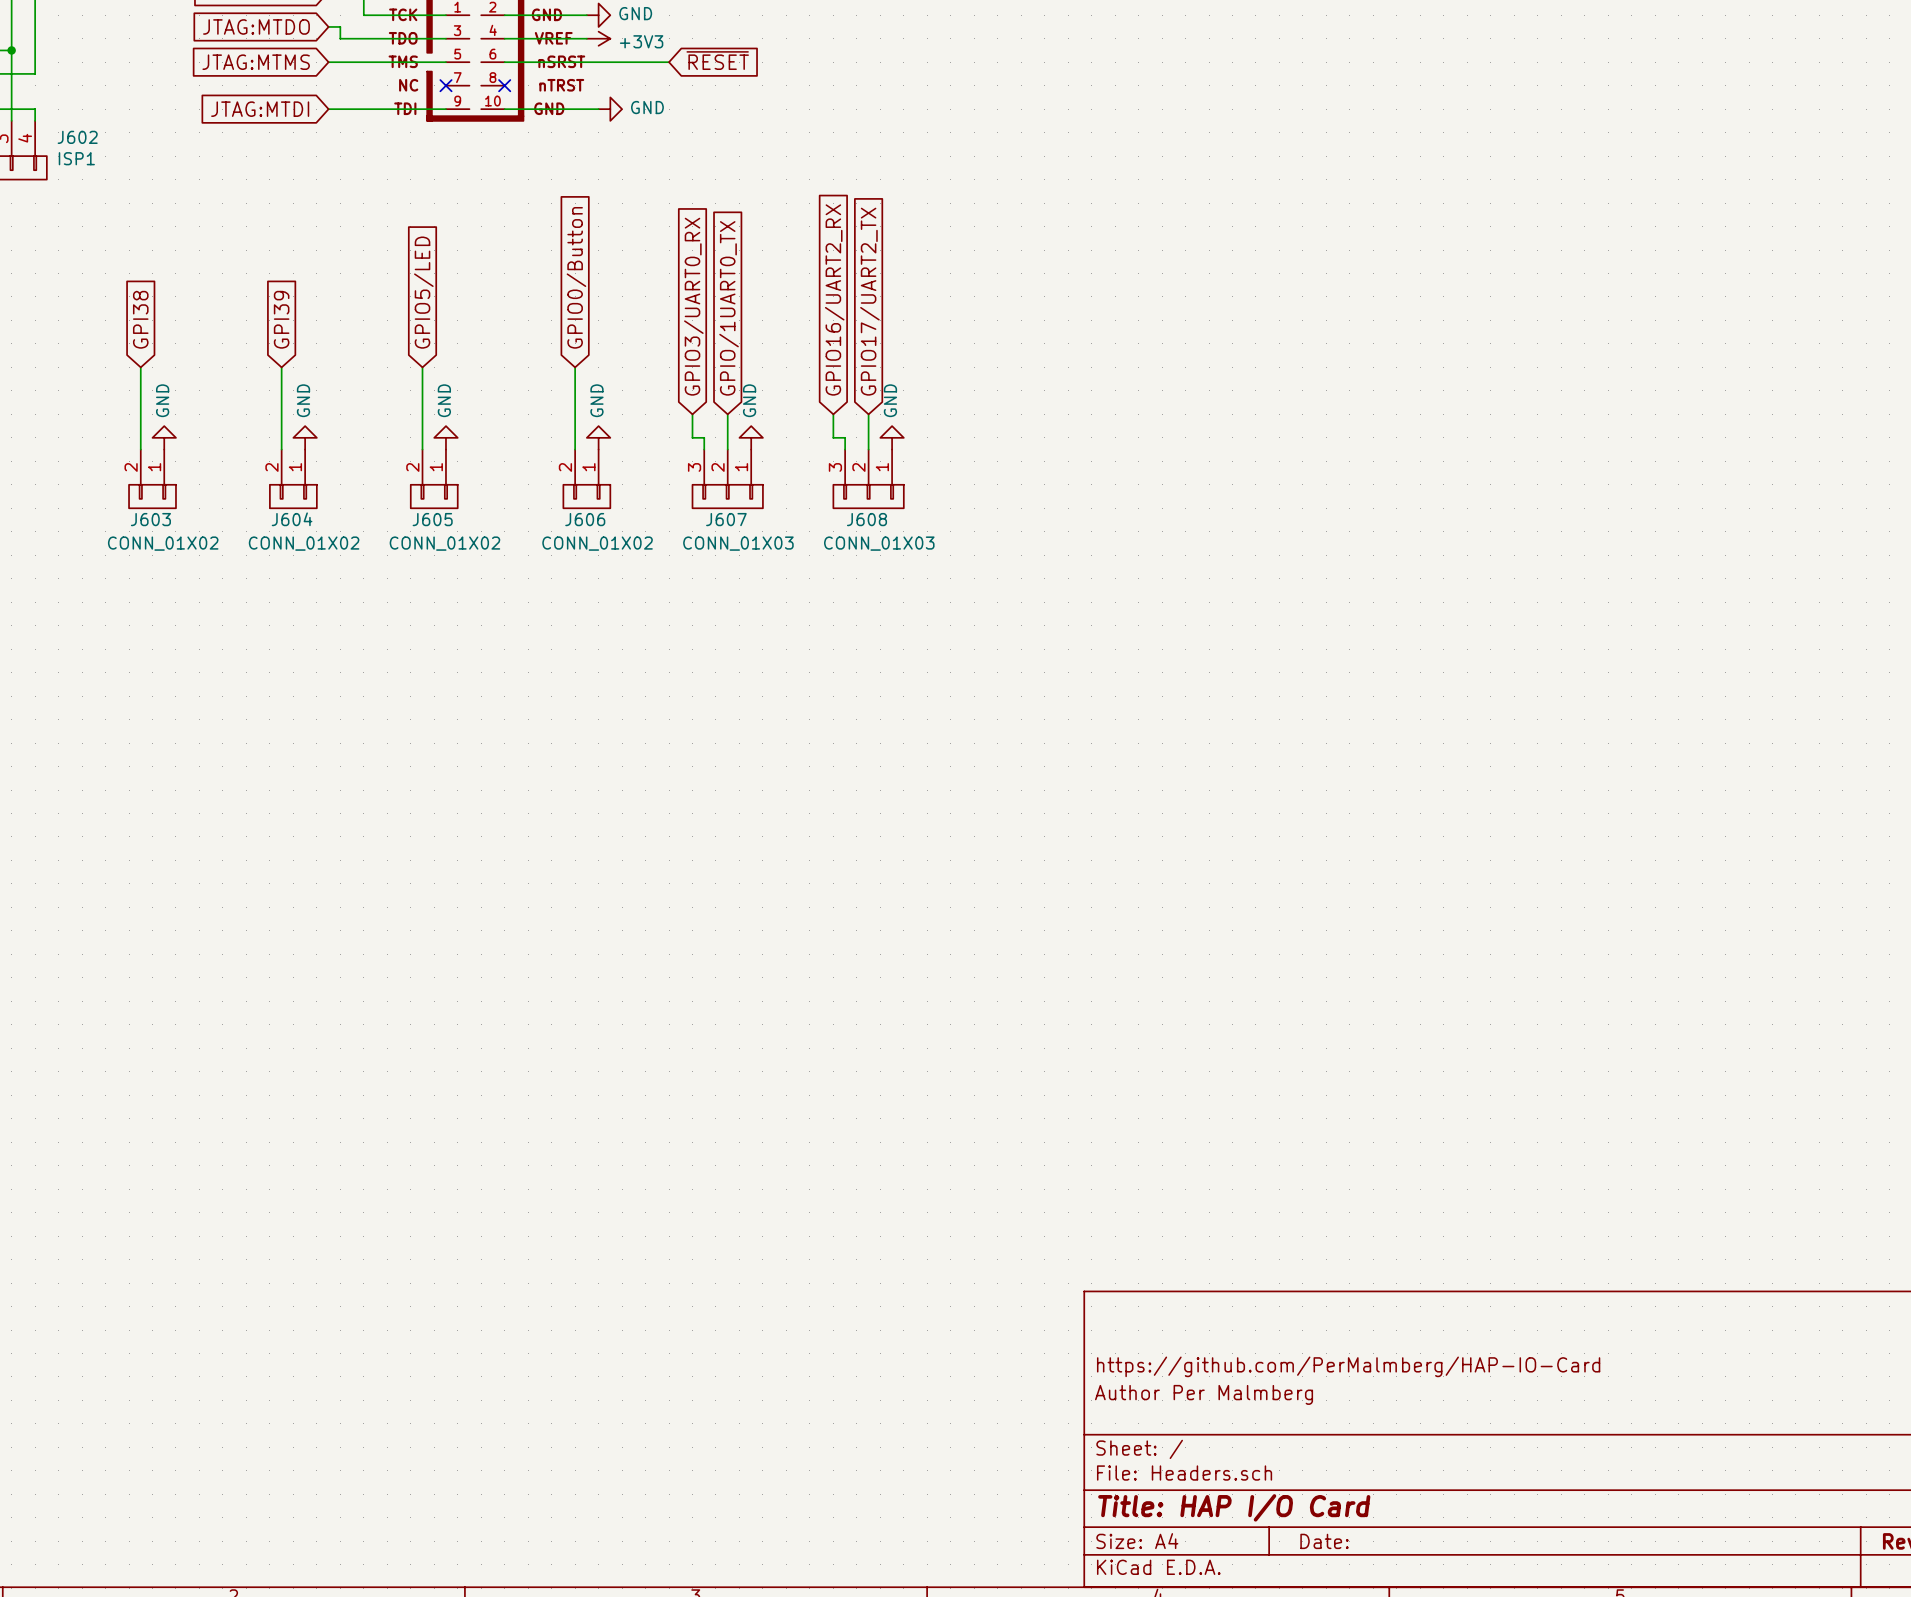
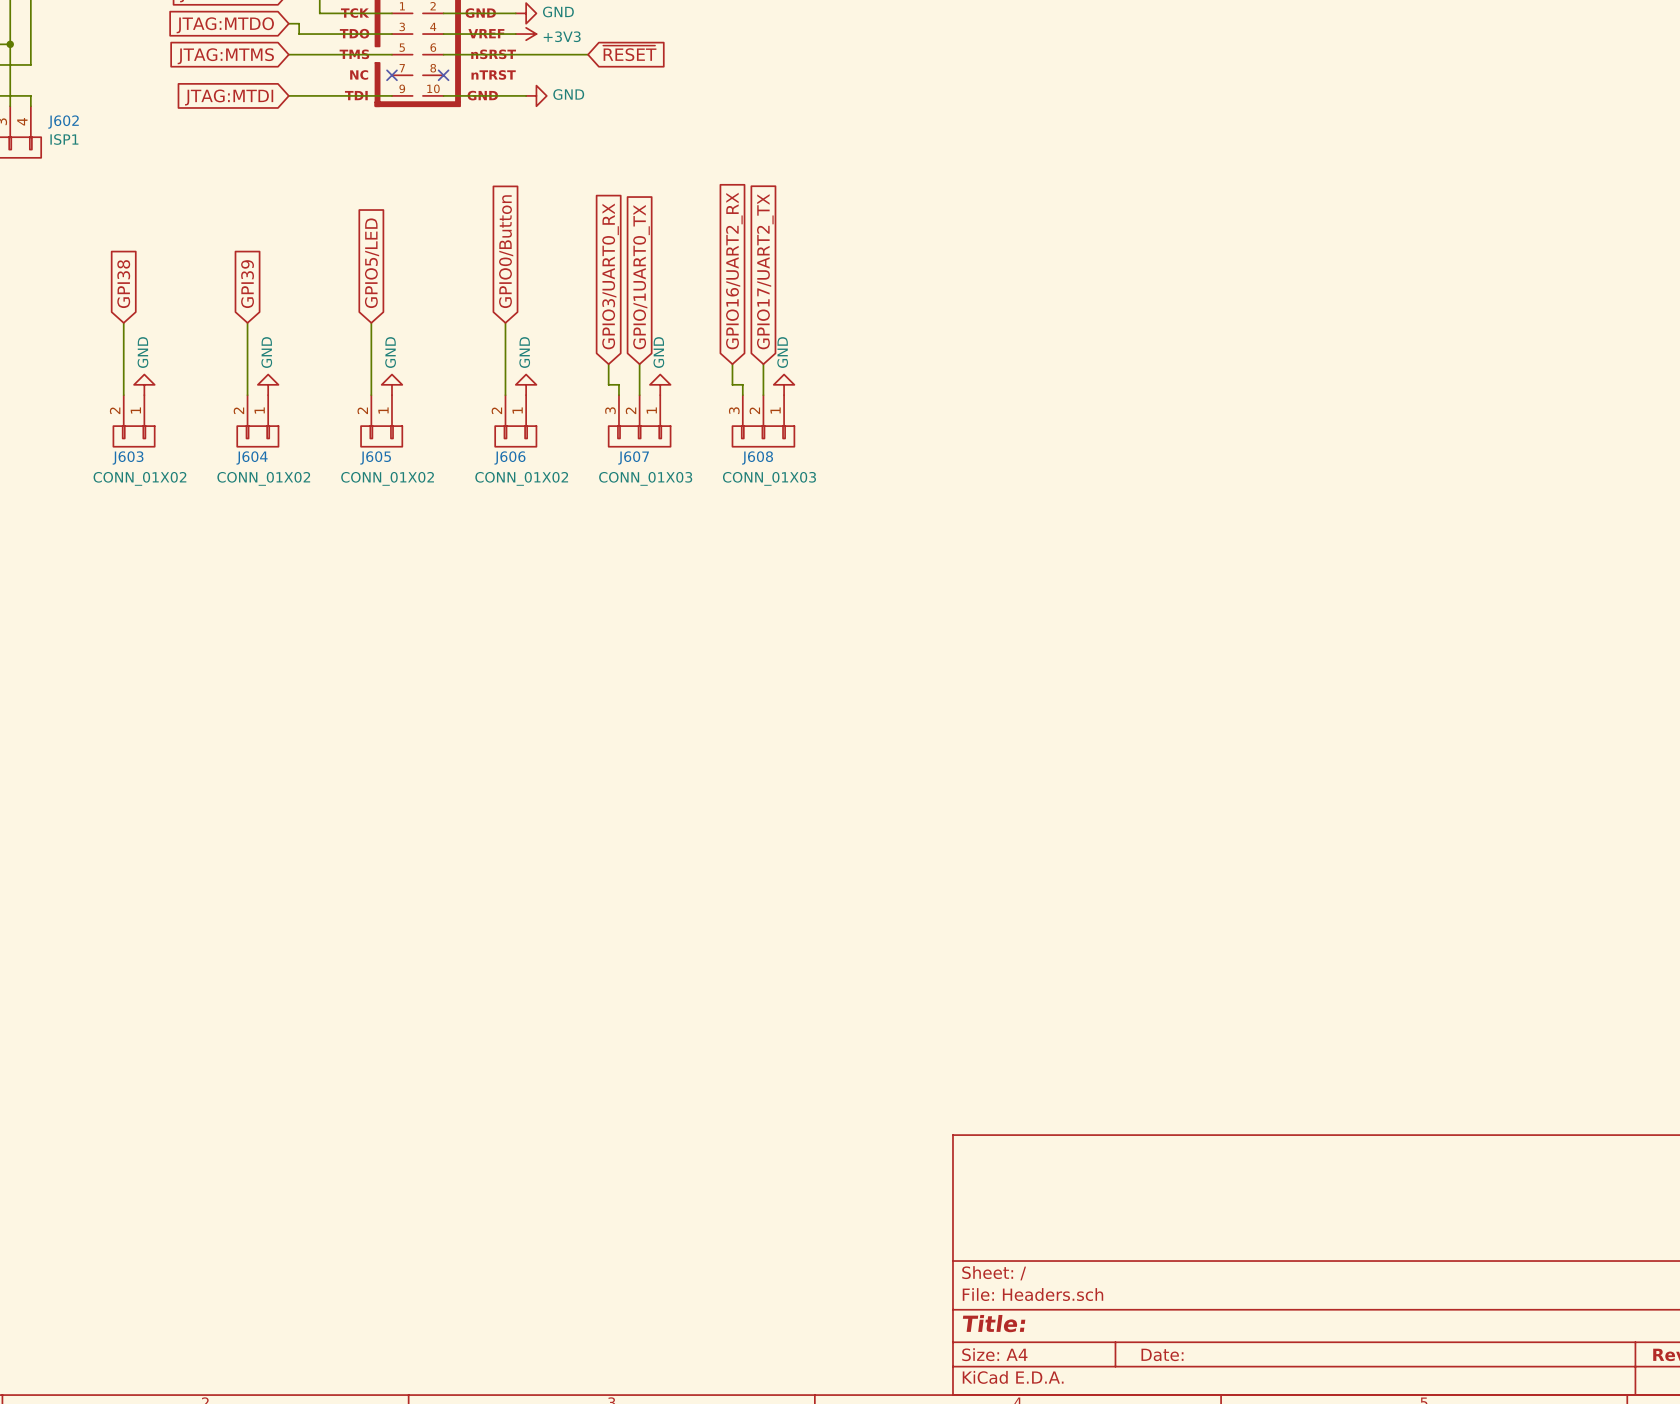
title block: https://github.com/PerMalmberg/HAP-IO-Card (1348, 1366) -> none
title block: Author Per Malmberg (1204, 1394) -> none
title block: Title: HAP I/O Card (1234, 1507) -> Title: (994, 1323)

